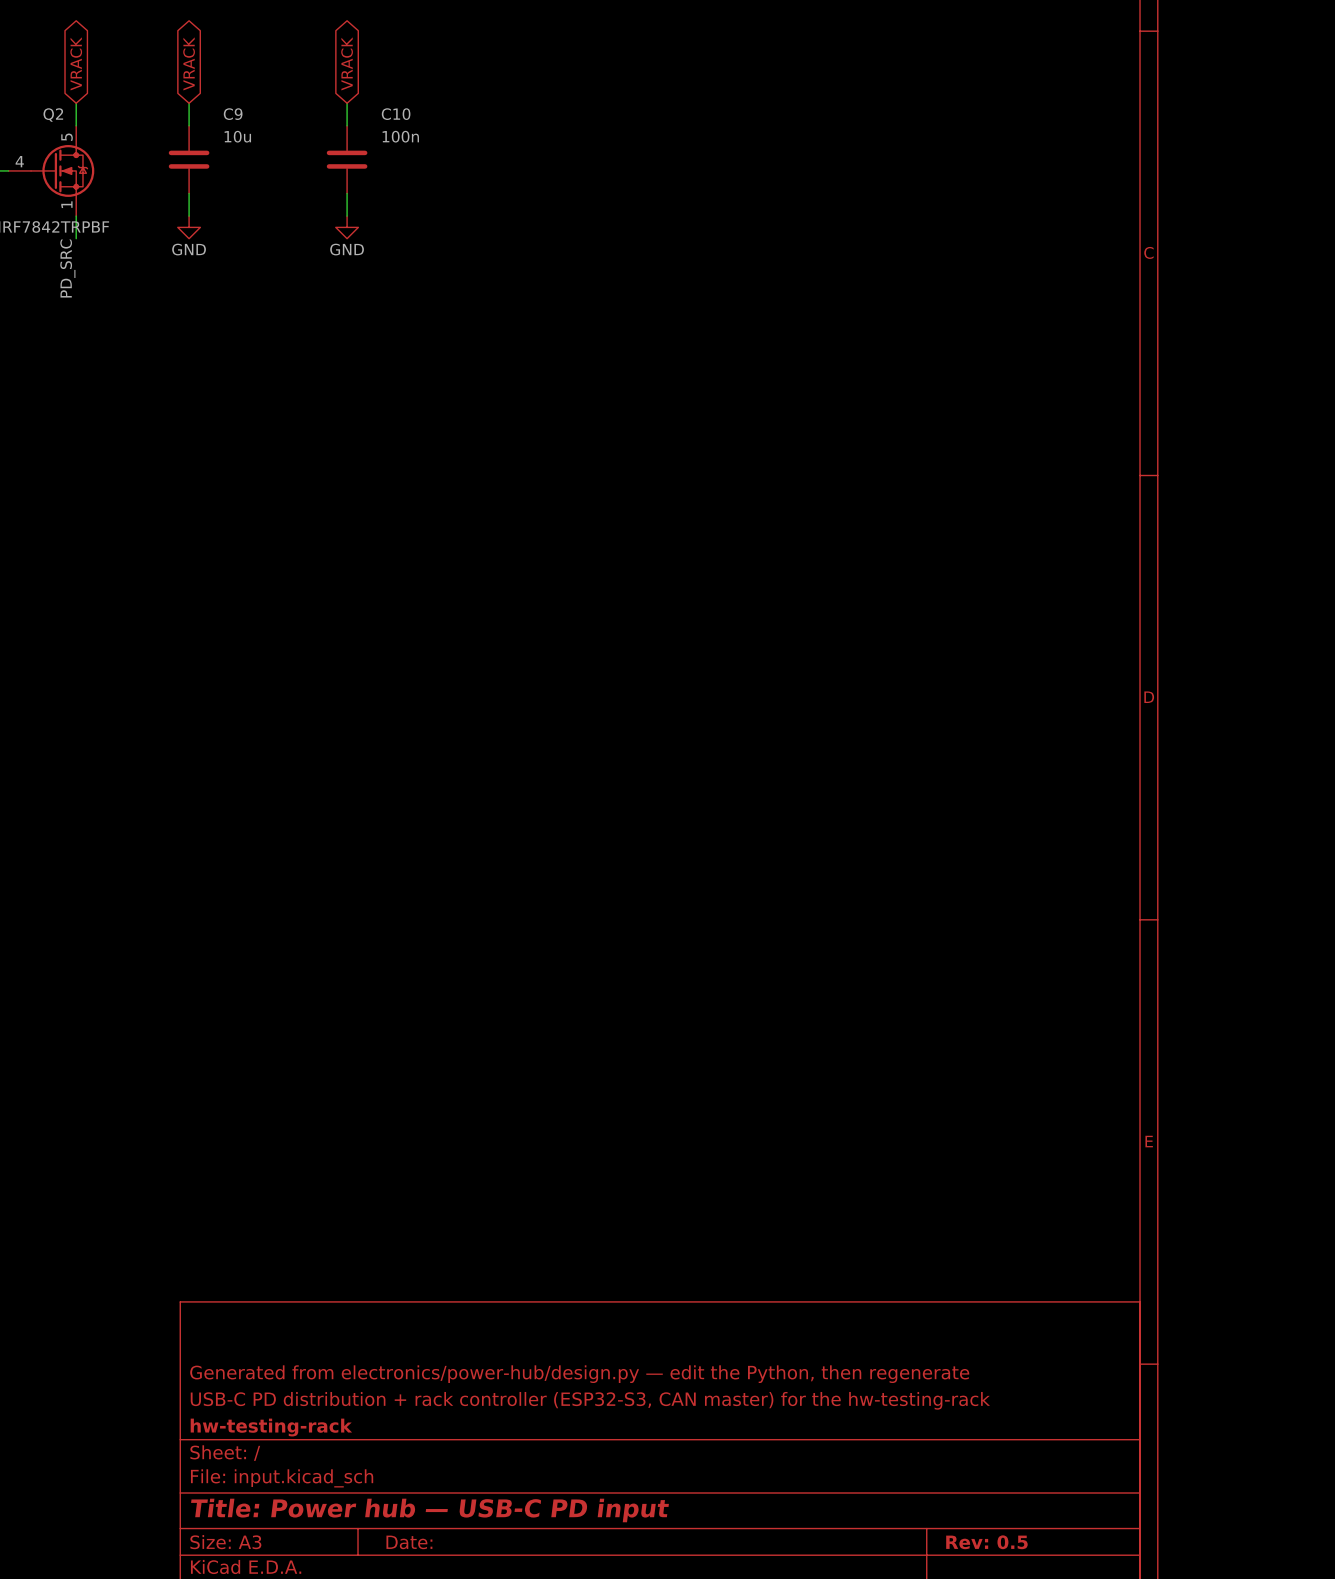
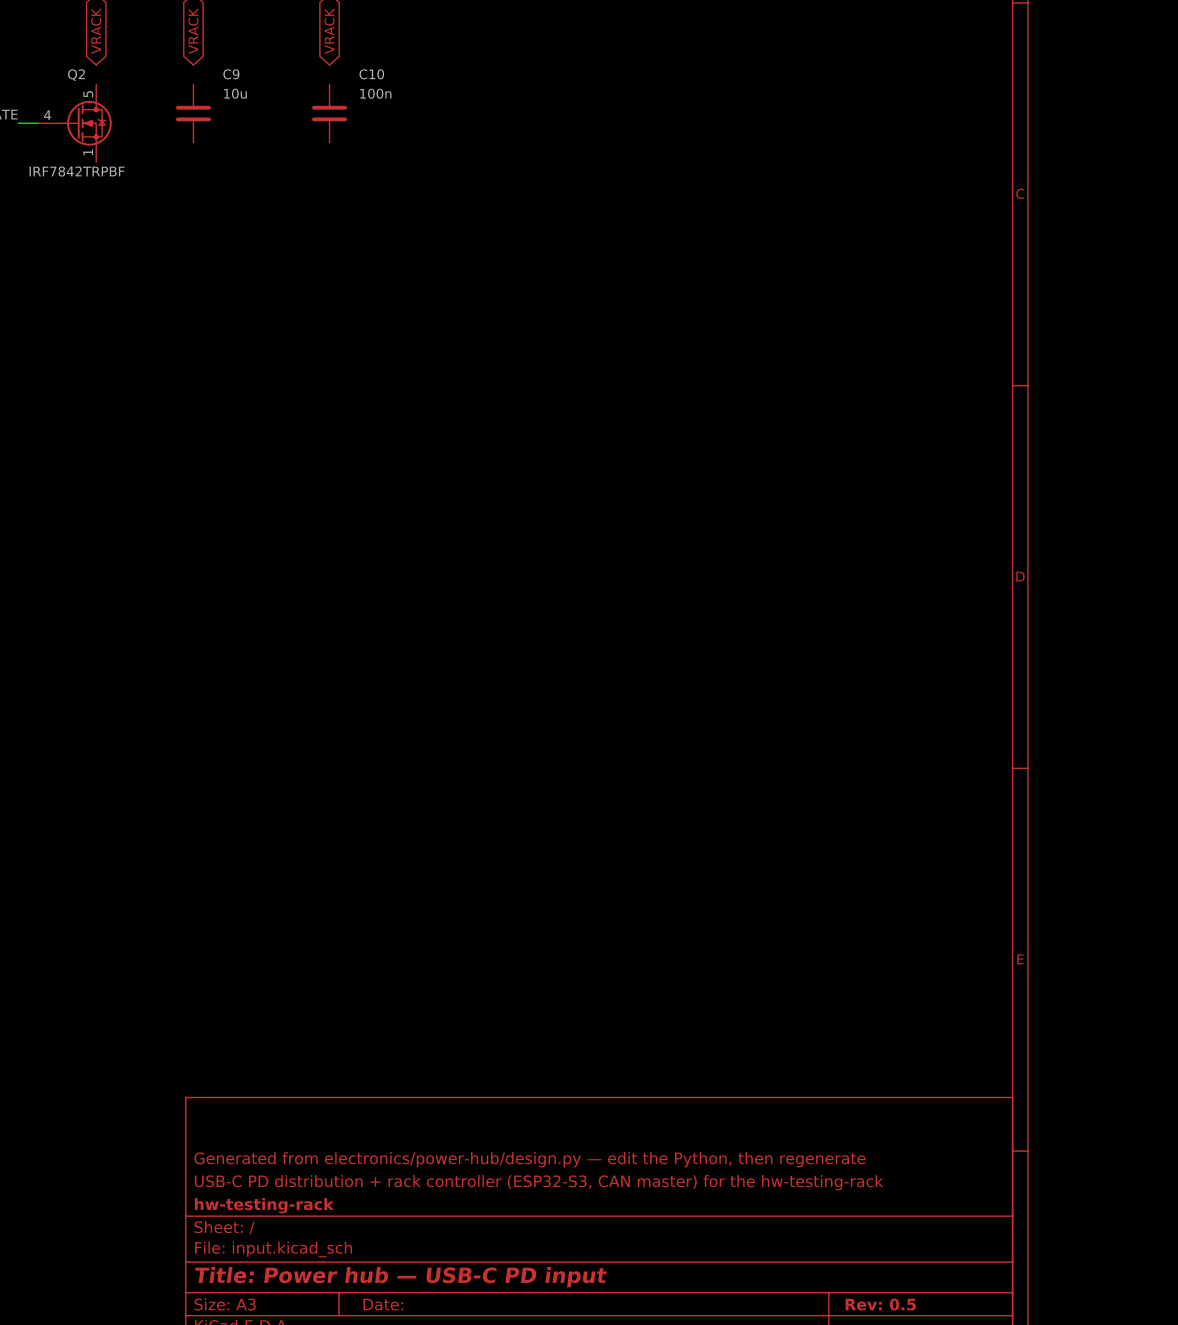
wire: (76, 103) (76, 125) -> none
wire: (189, 103) (189, 125) -> none
wire: (347, 103) (347, 125) -> none
wire: (189, 193) (189, 216) -> none
wire: (347, 193) (347, 216) -> none
wire: (76, 216) (76, 238) -> none
power symbol: GND (189, 227) -> none
power symbol: GND (347, 227) -> none
label: PD_SRC (67, 268) -> none

